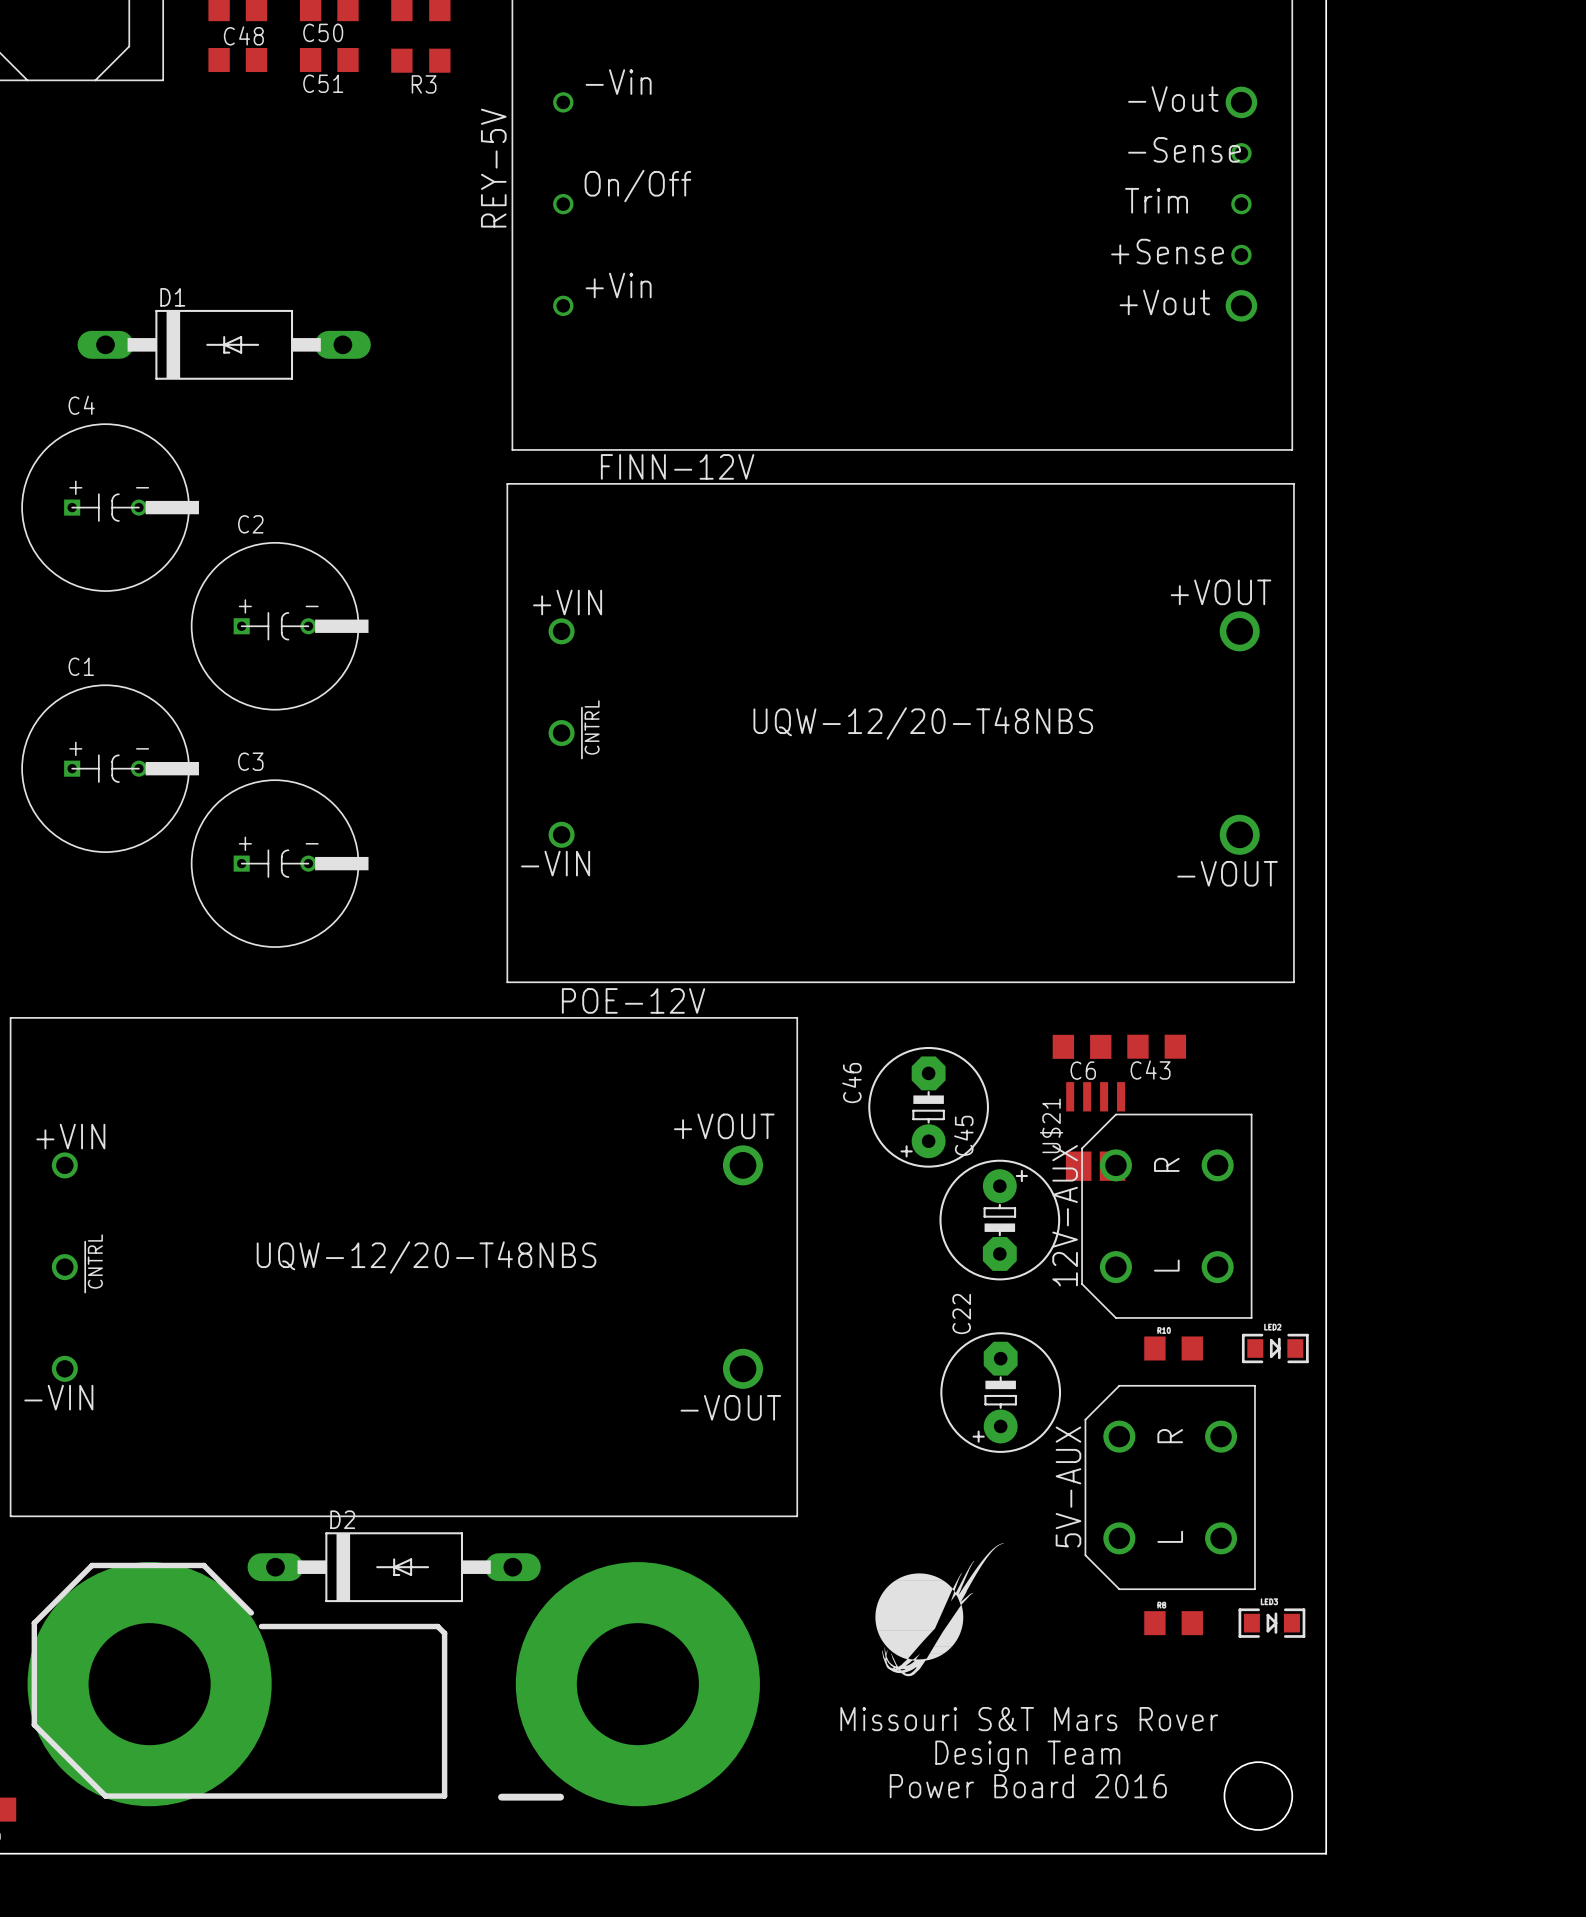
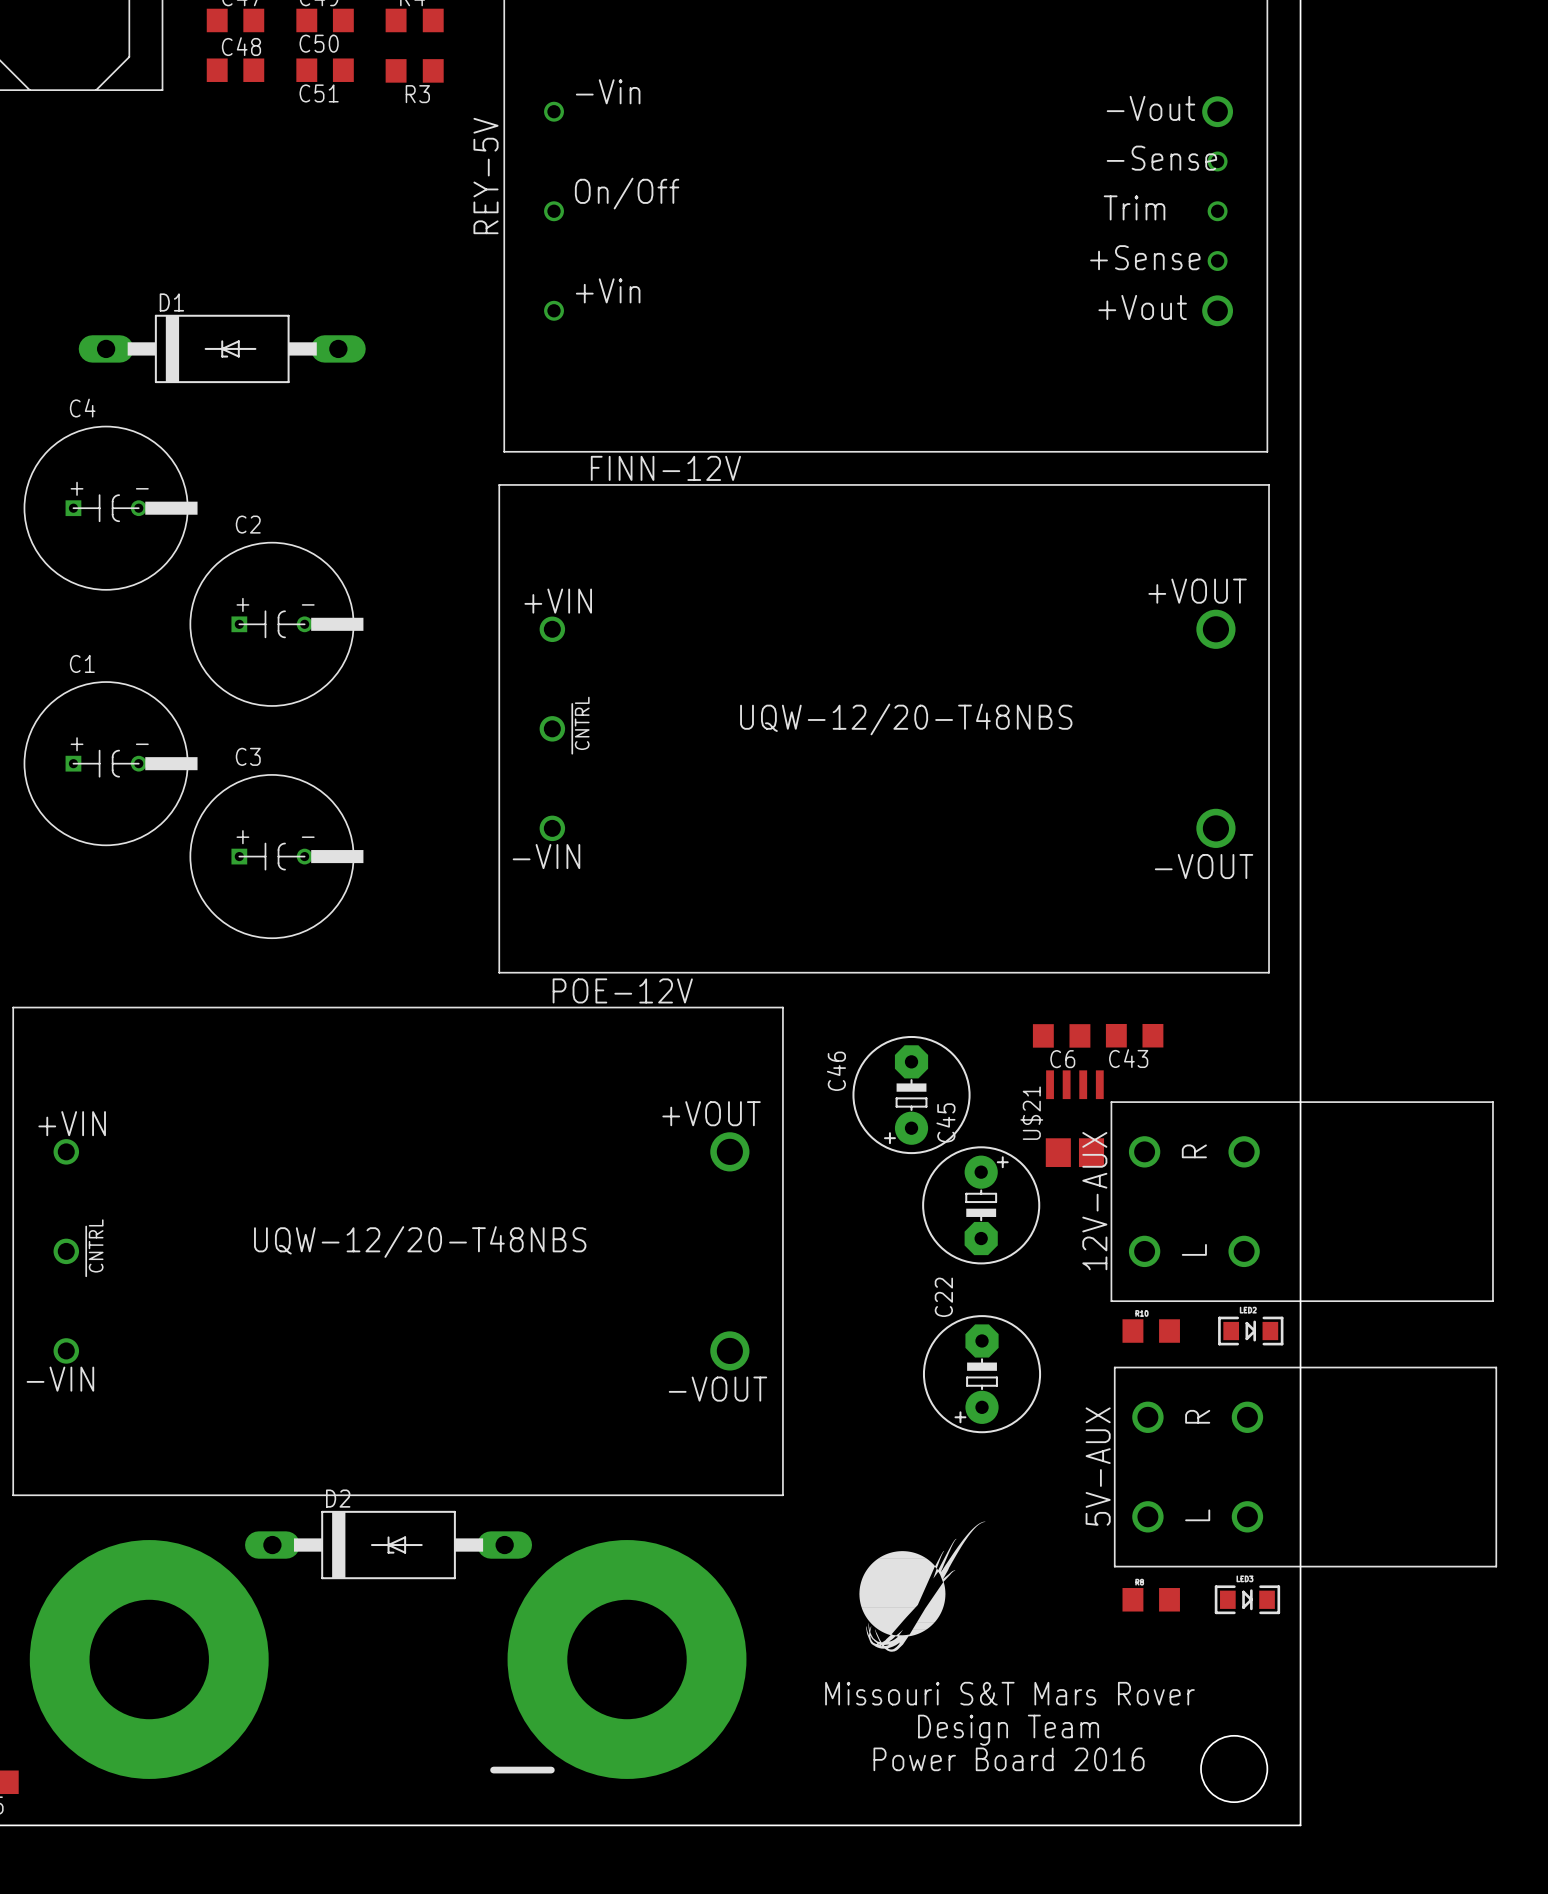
12V-AUX footprint: [1081, 1113, 1253, 1319] -> [1110, 1101, 1494, 1302]
12V-AUX name position: 12V-AUX (1065, 1215) -> 12V-AUX (1094, 1201)
5V-AUX footprint: [1084, 1384, 1256, 1591] -> [1113, 1366, 1498, 1568]
5V-AUX name position: 5V-AUX (1068, 1486) -> 5V-AUX (1098, 1466)
line: (251, 1612) (203, 1565) (91, 1565) (34, 1623) (34, 1724) (105, 1796) (444, 1796) (444, 1633) (437, 1626) (261, 1626) -> none

